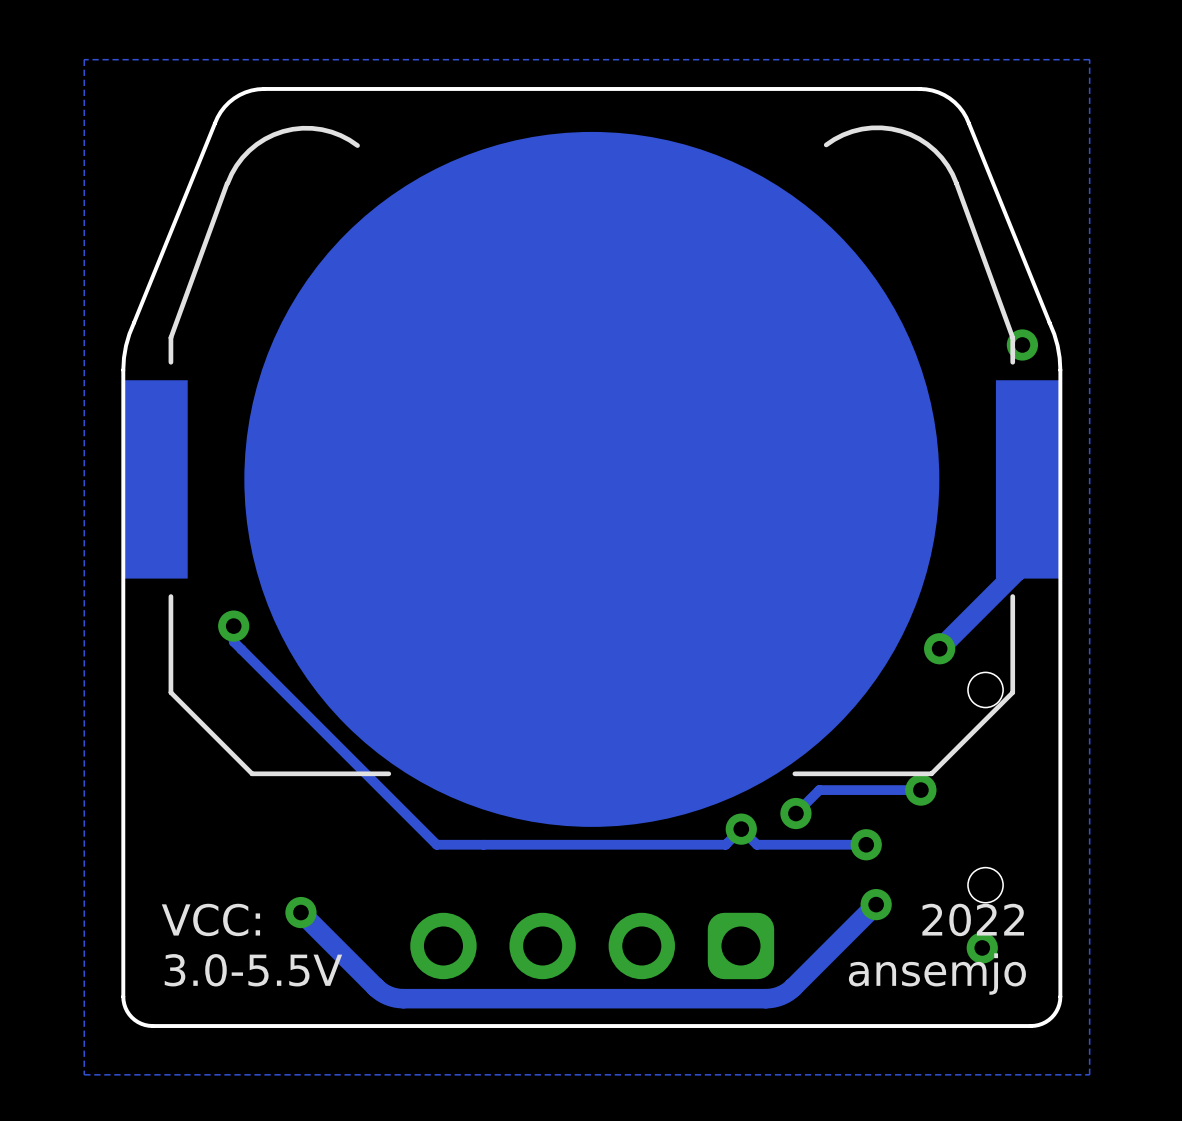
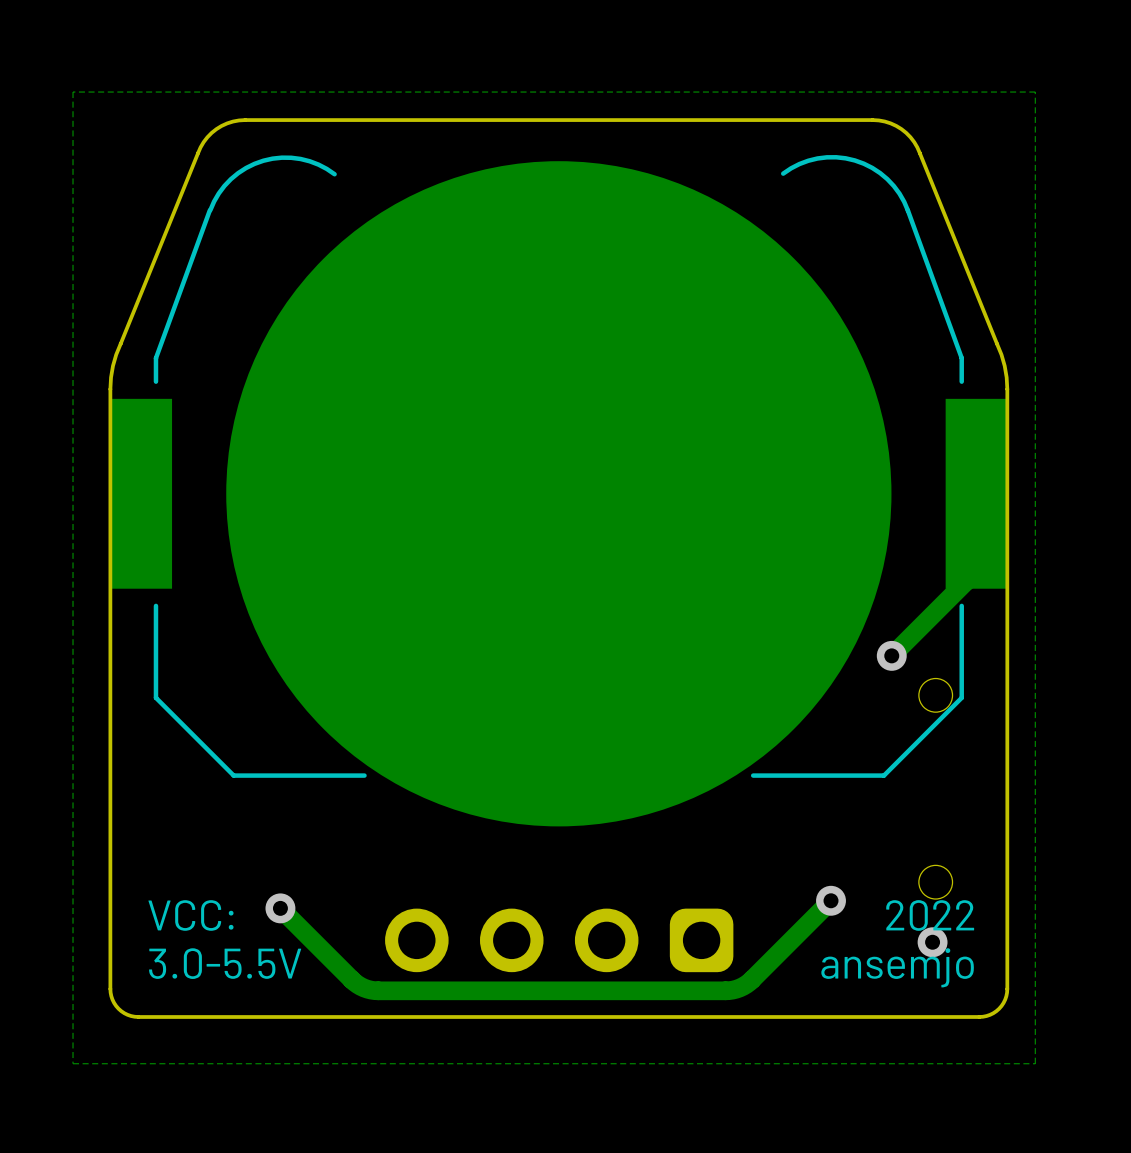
via: (1022, 344) -> none
track: (233, 626) (233, 641) (436, 844) (725, 844) (741, 829) (756, 844) (866, 844) -> none
via: (233, 626) -> none
track: (920, 790) (819, 790) (795, 813) -> none
via: (920, 790) -> none
via: (795, 813) -> none
via: (741, 829) -> none
via: (866, 844) -> none

